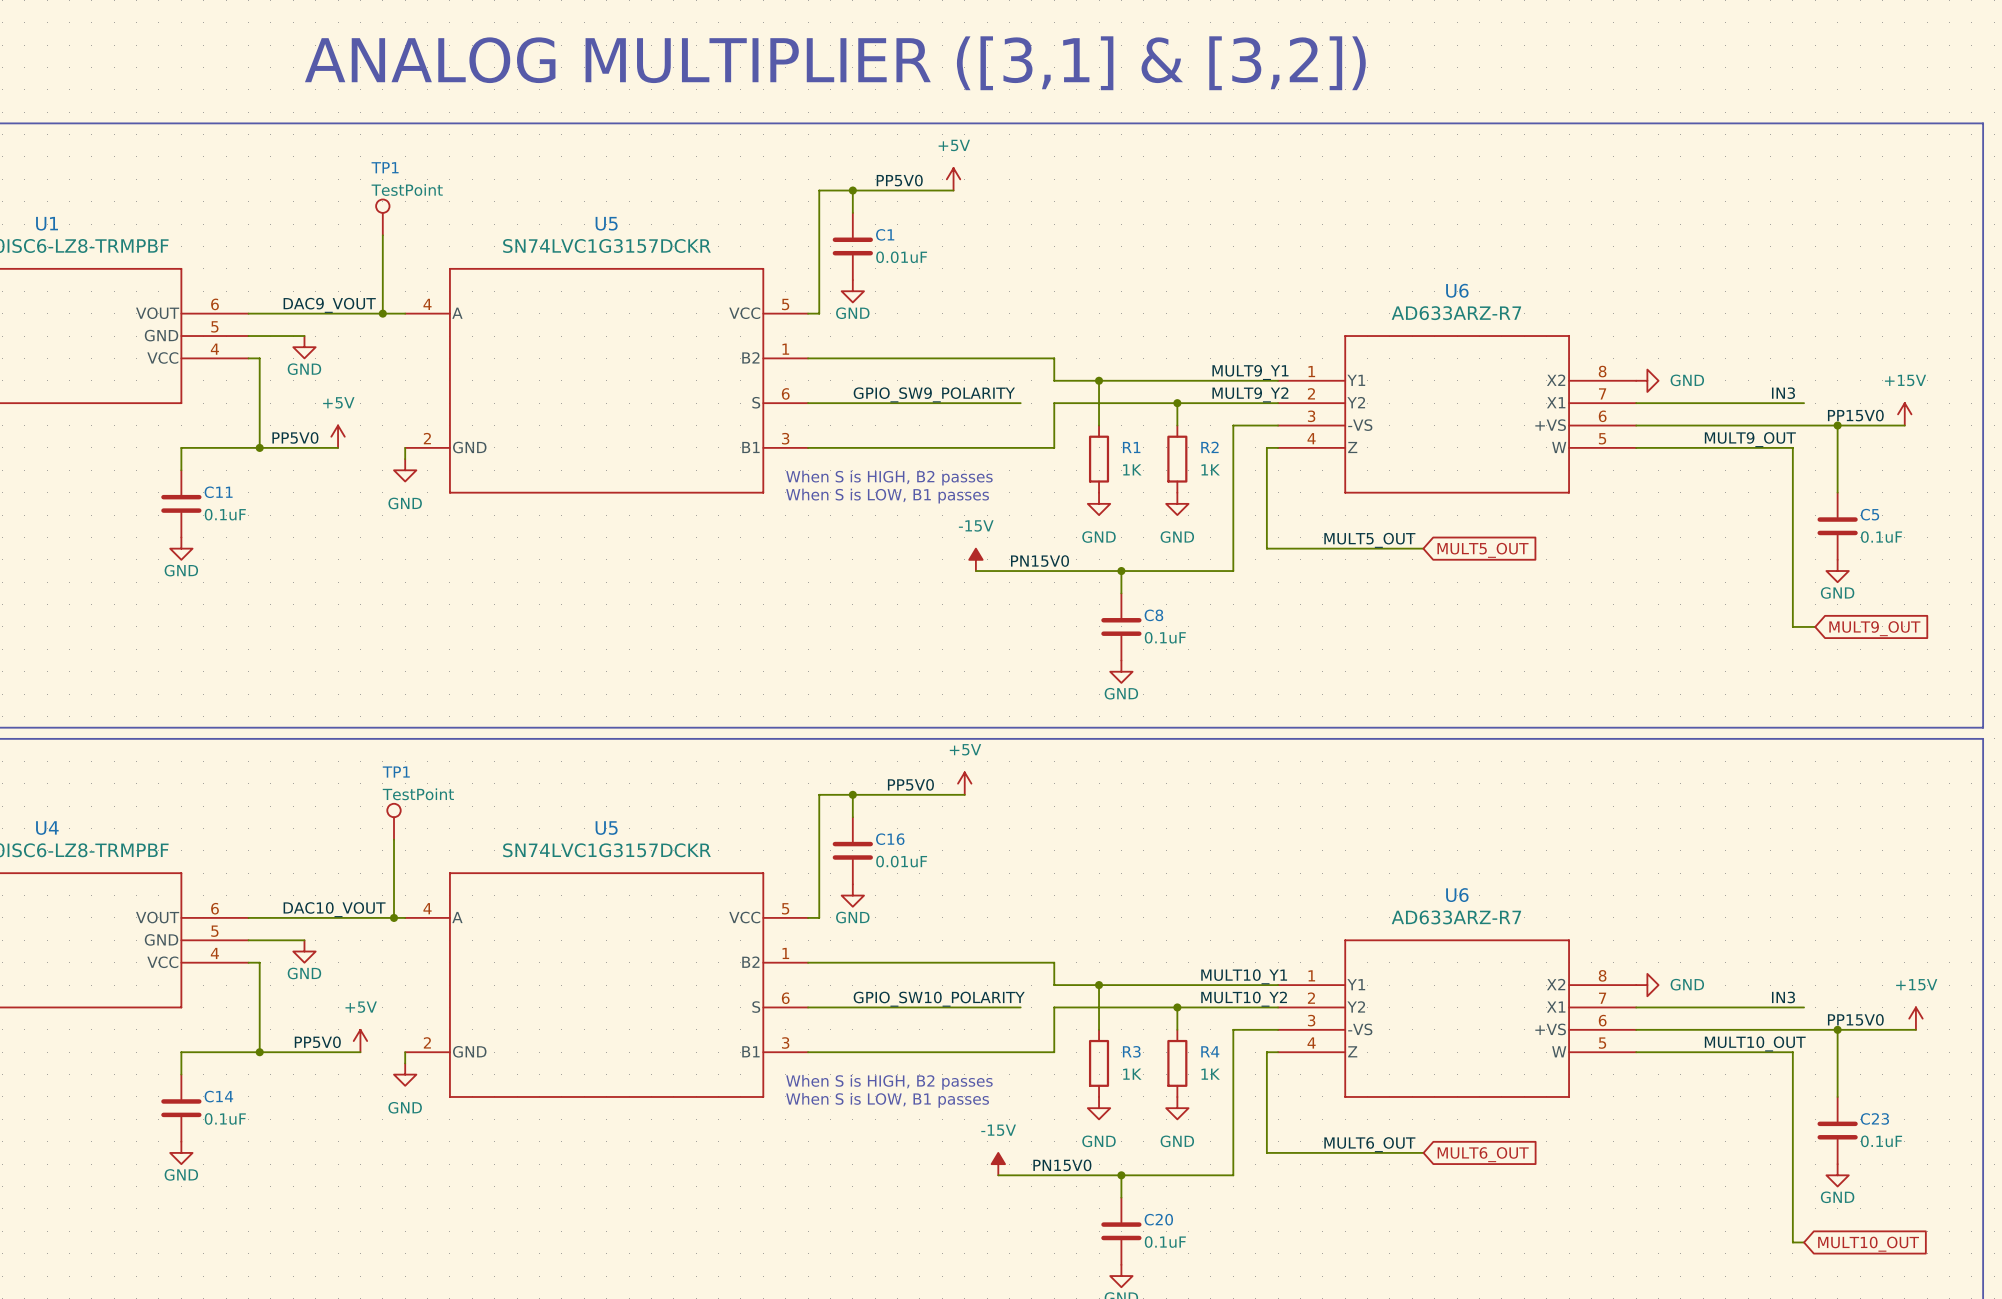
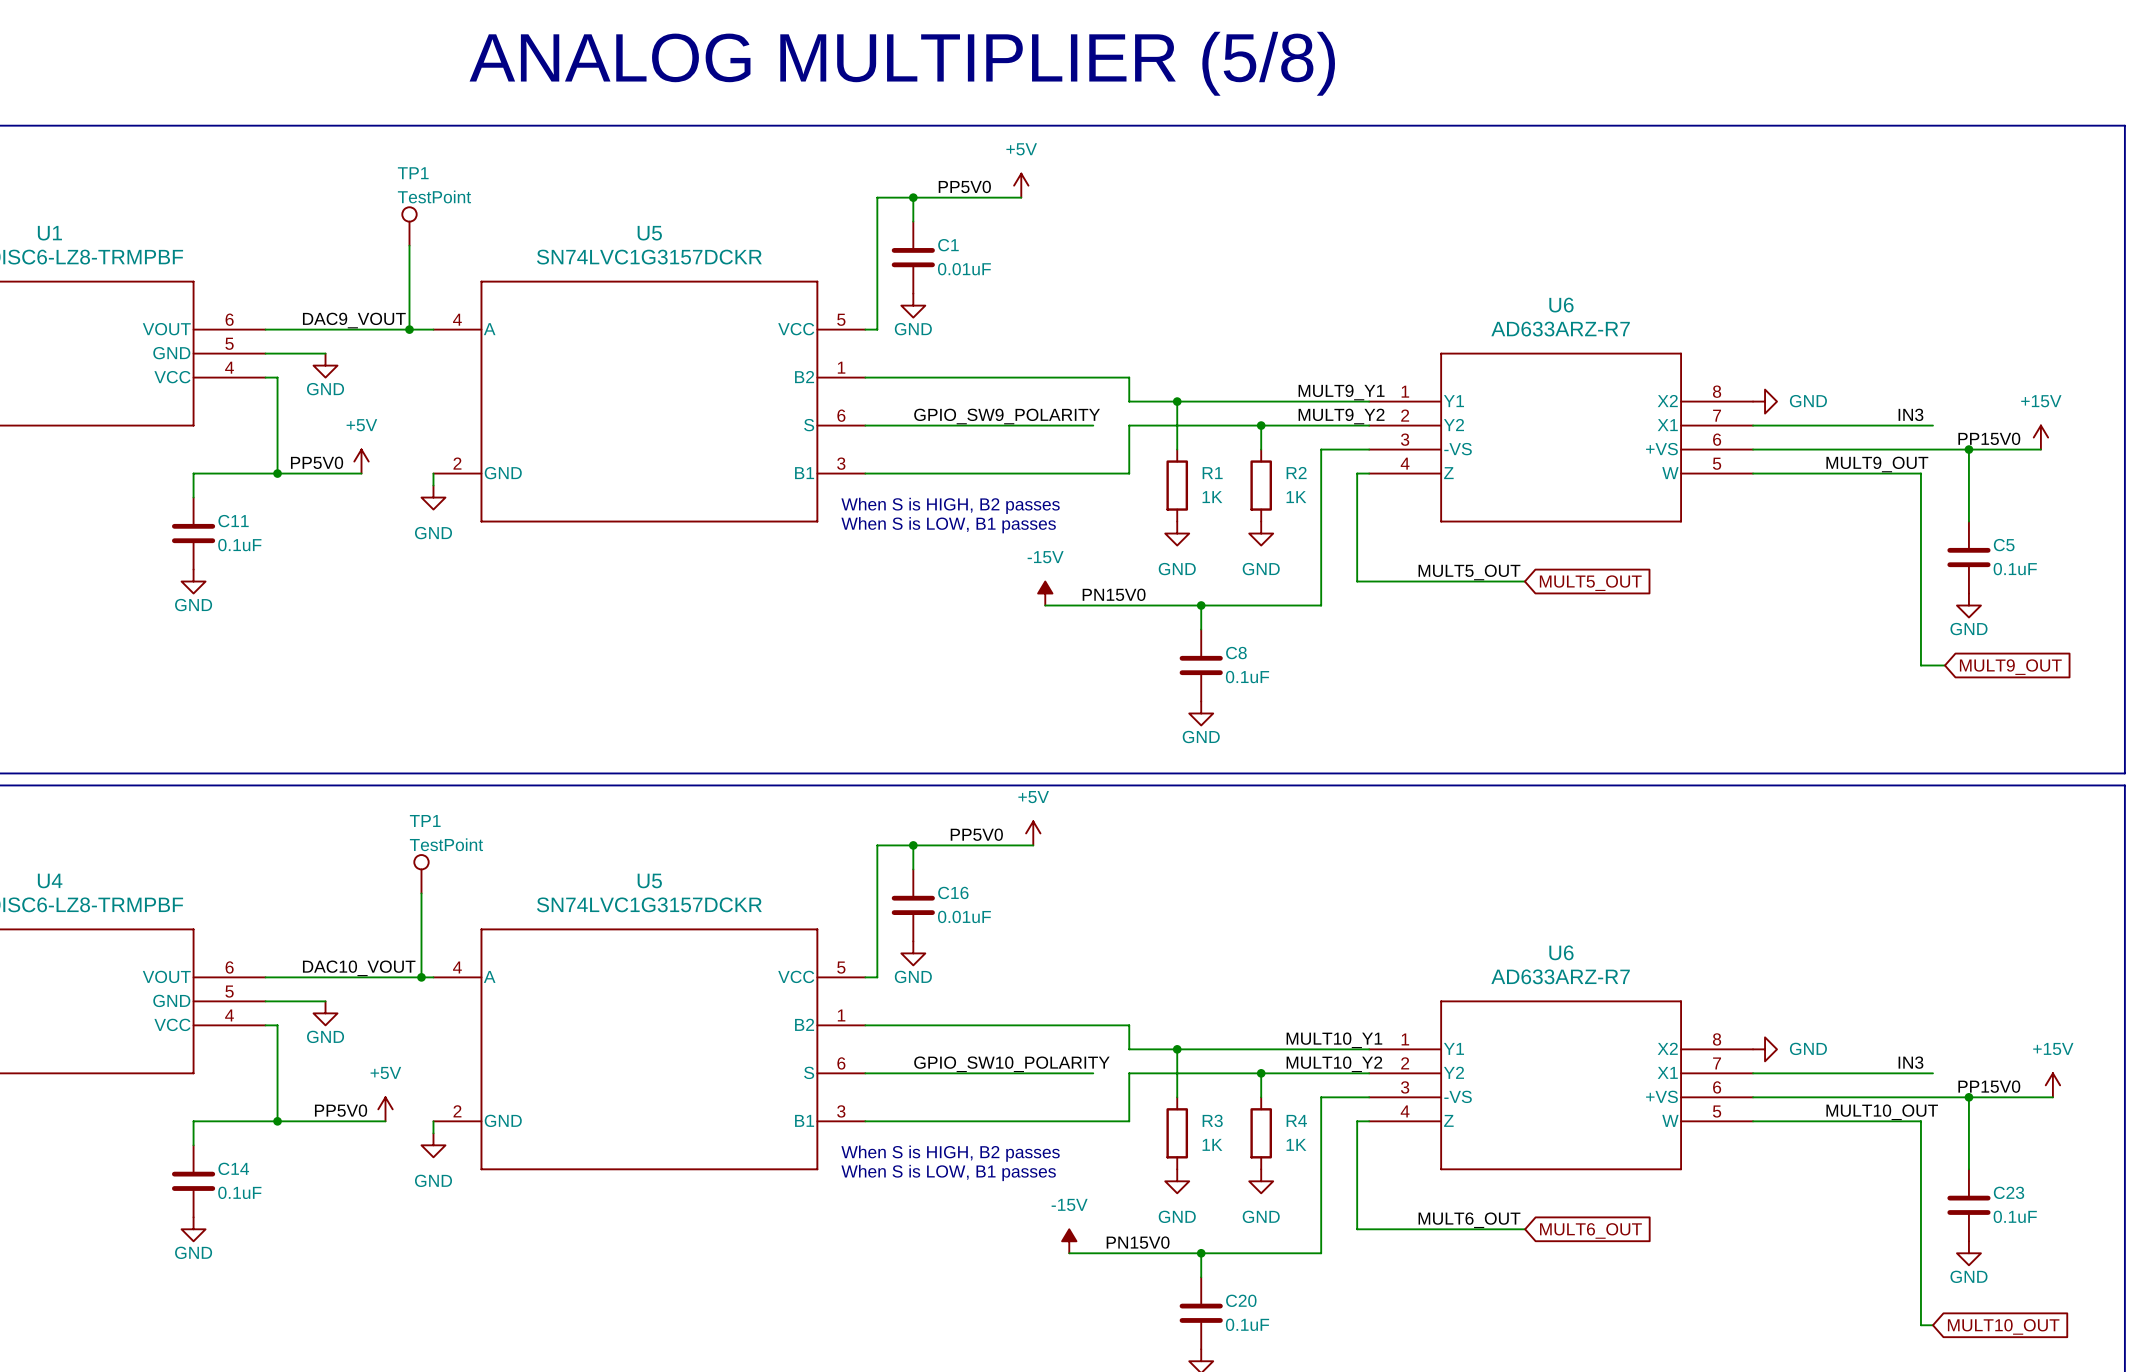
text: ANALOG MULTIPLIER ([3,1] & [3,2]) (835, 63) -> ANALOG MULTIPLIER (5/8) (902, 63)

